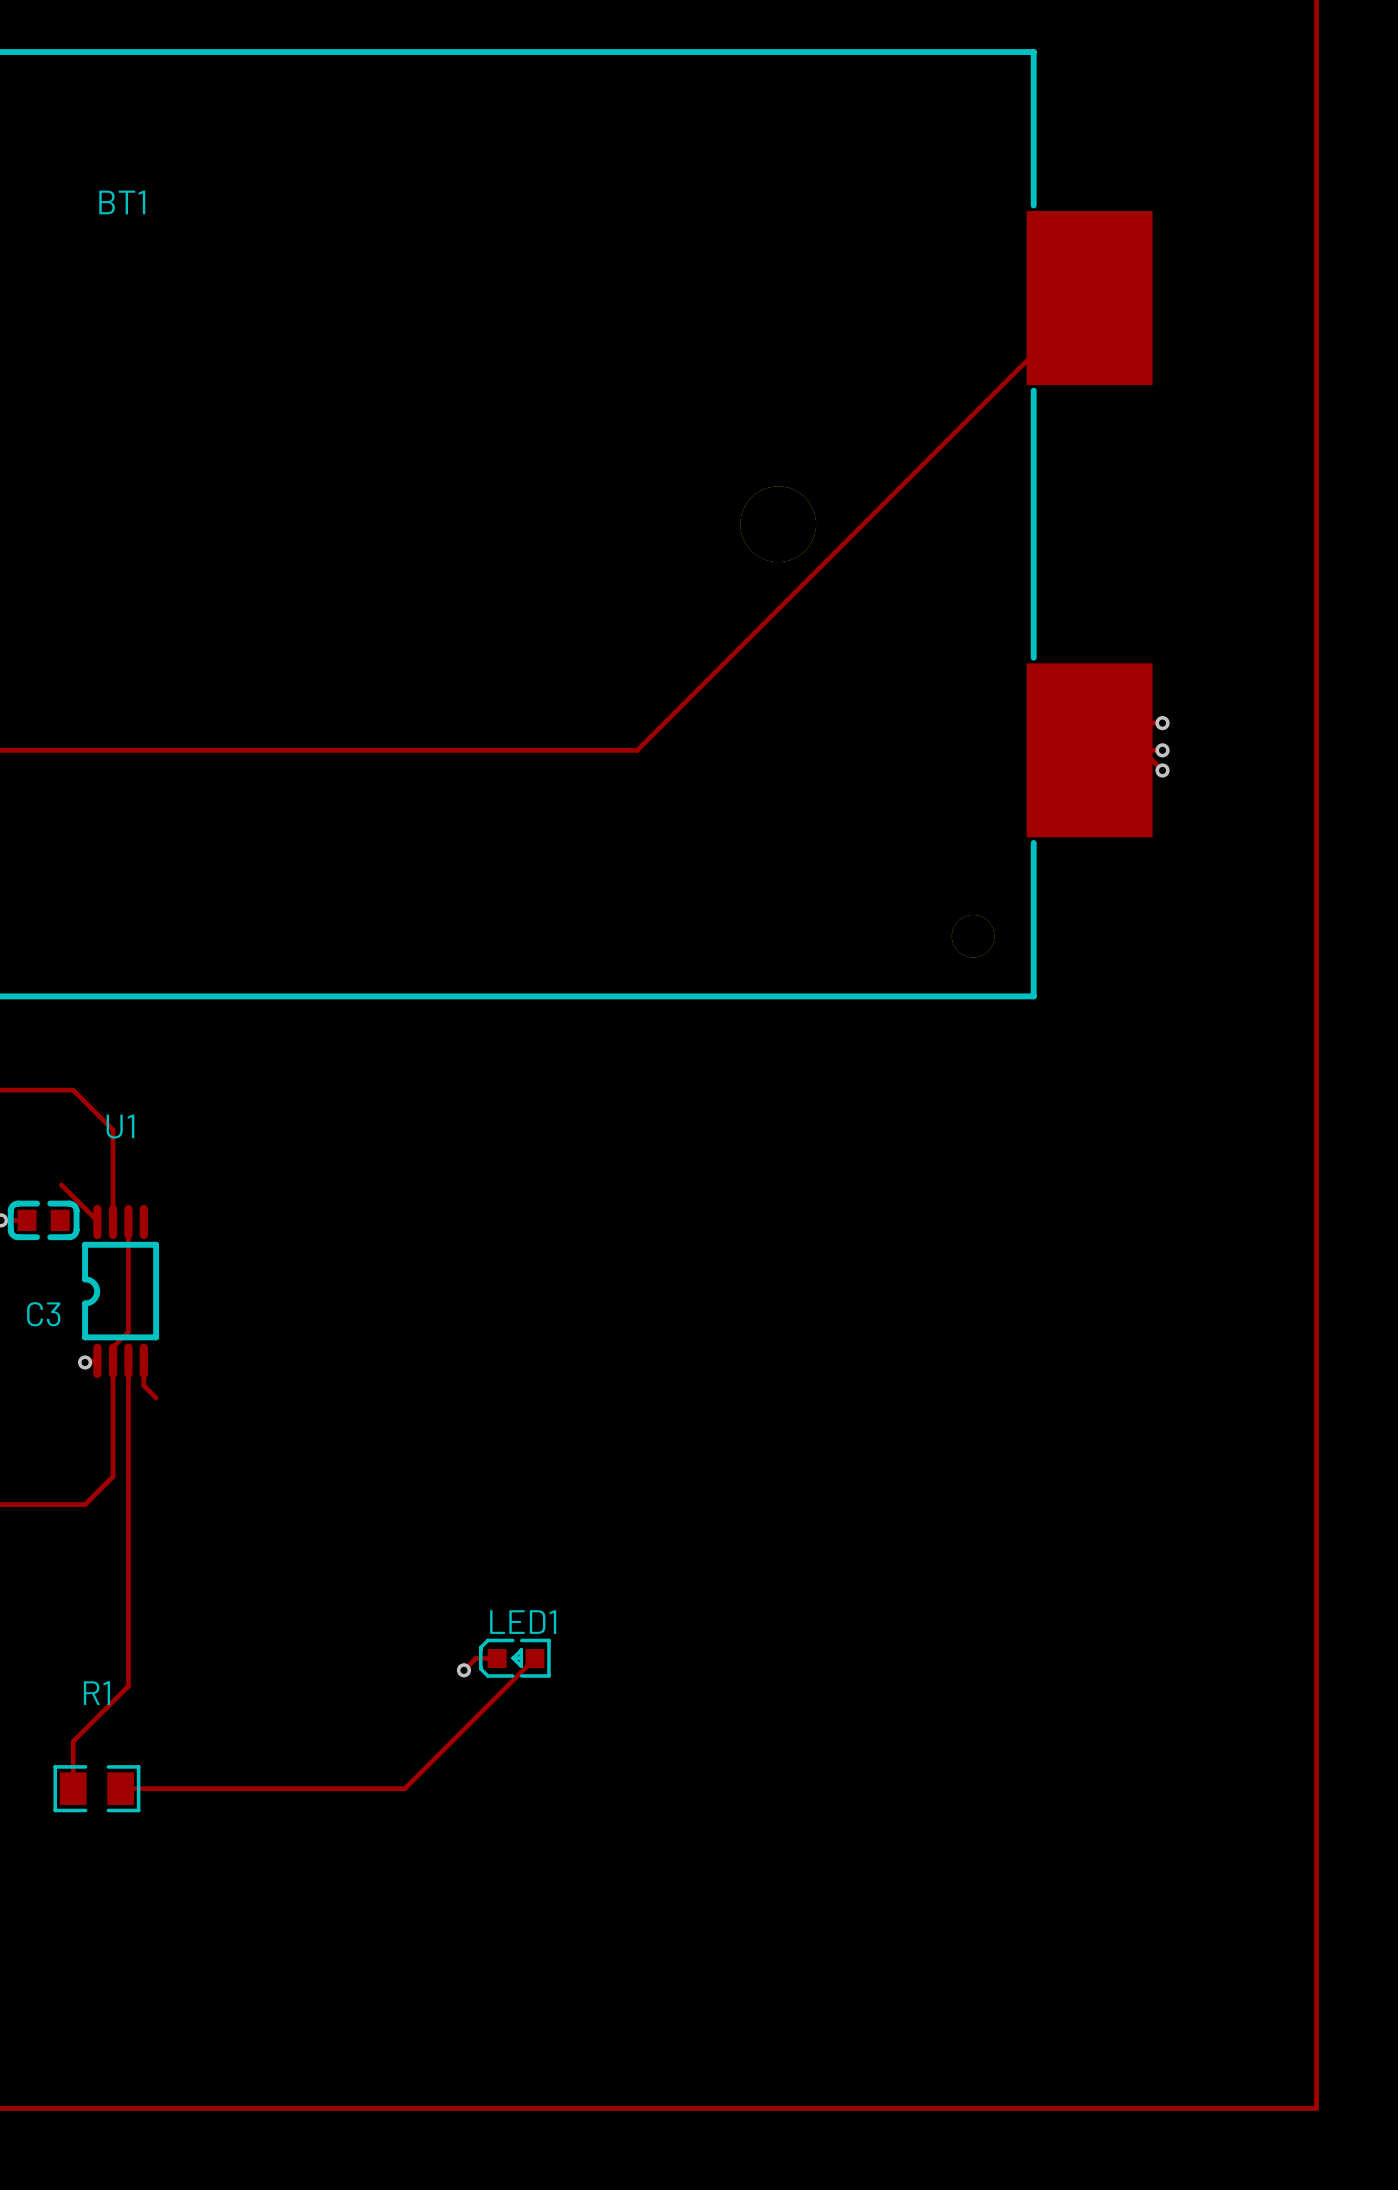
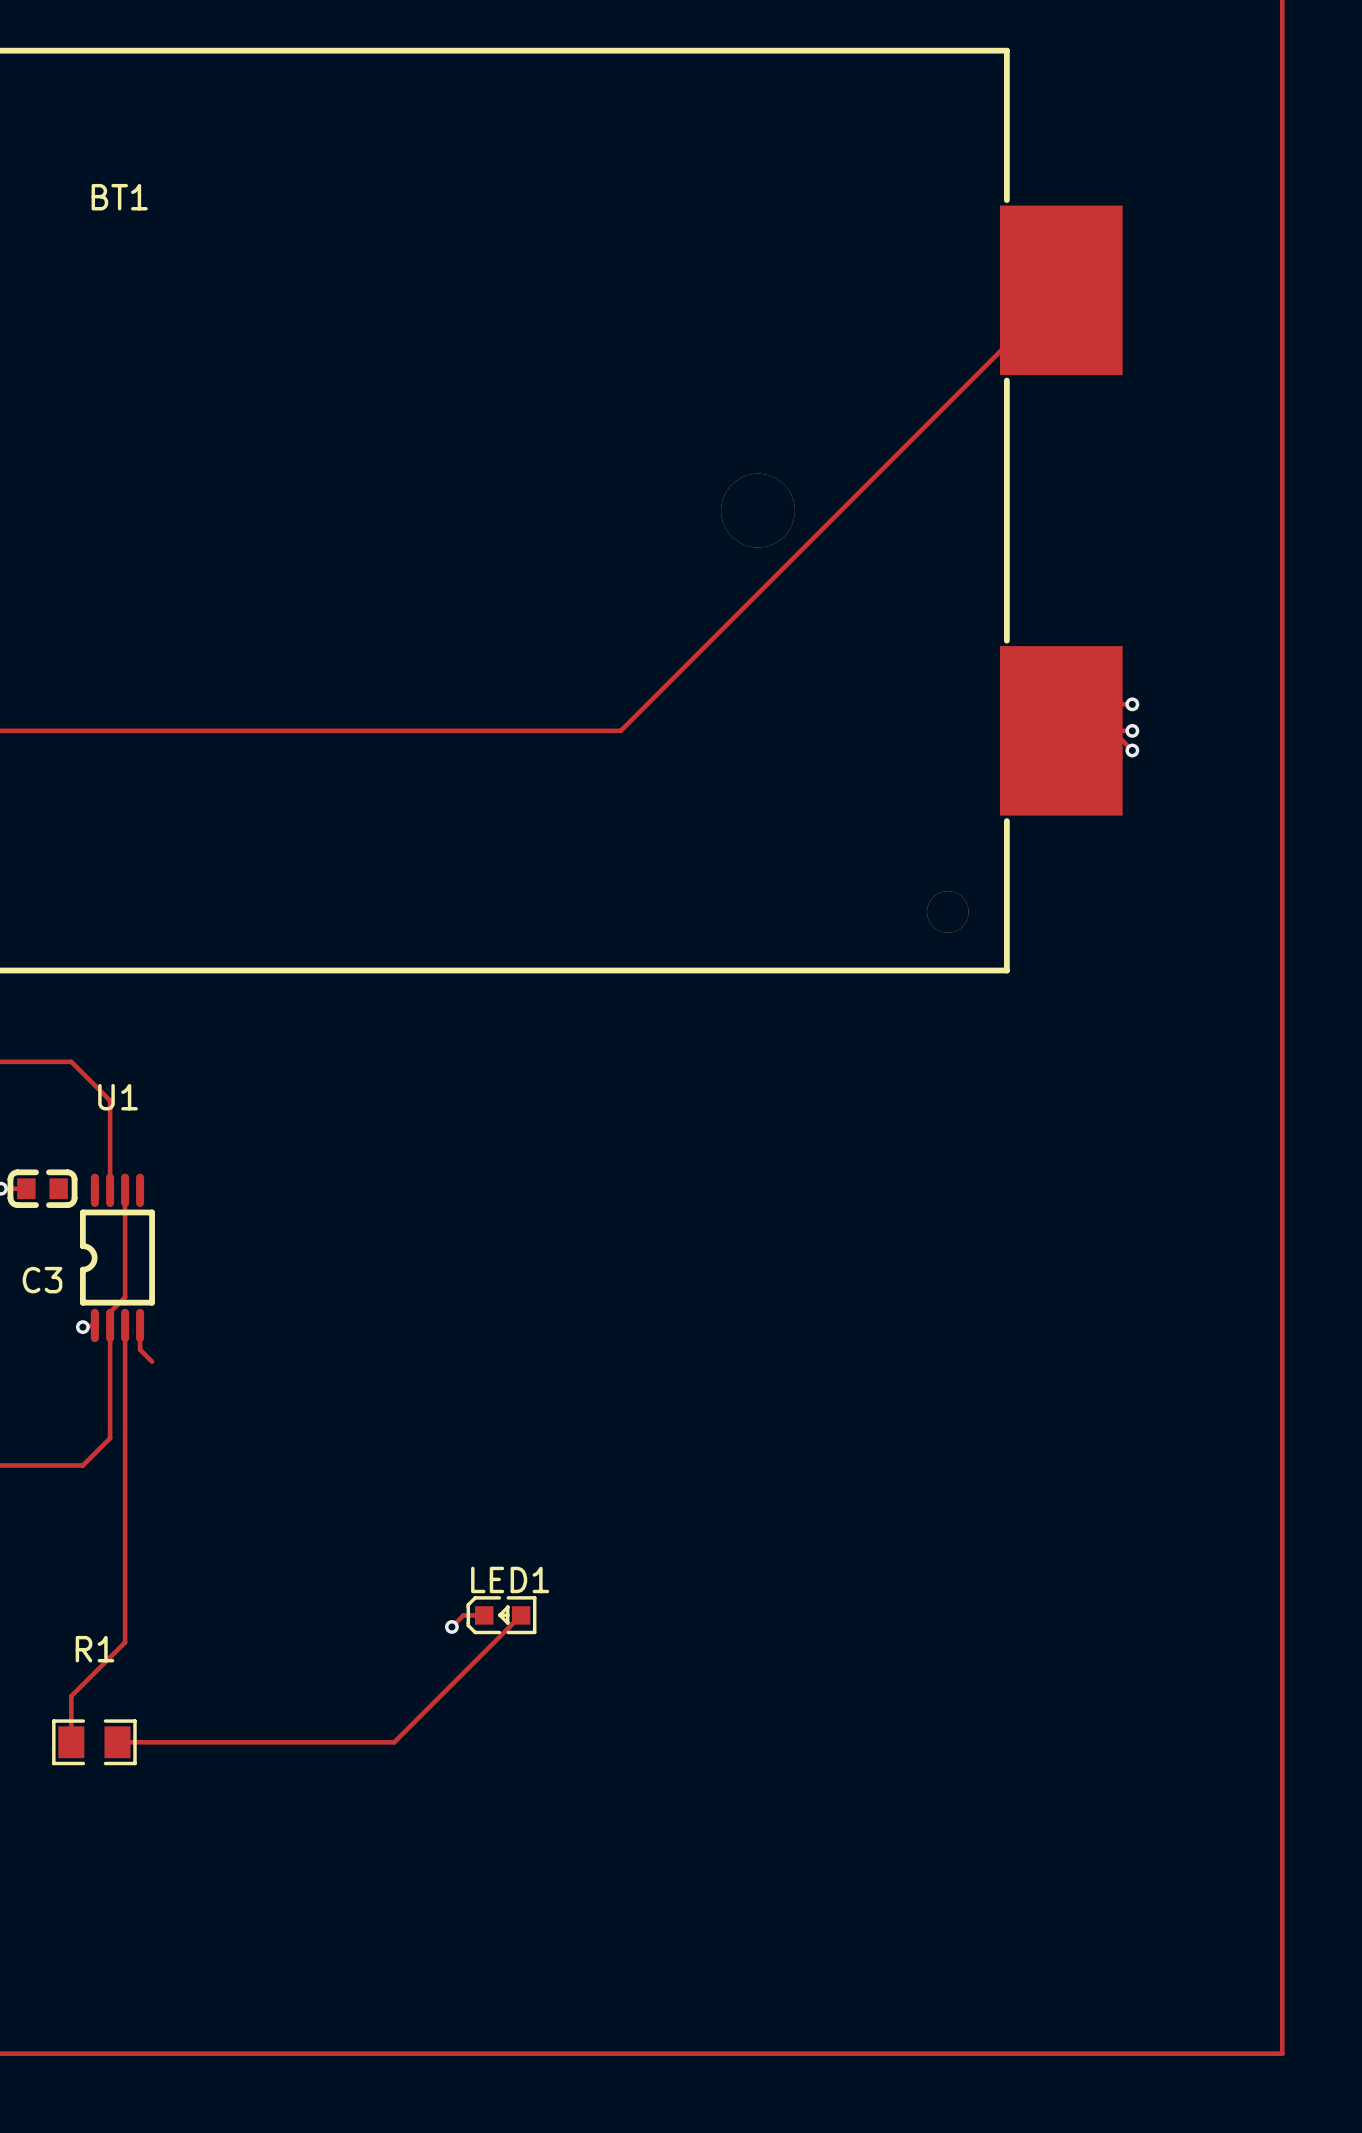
track: (61, 1184) (97, 1220) -> none

